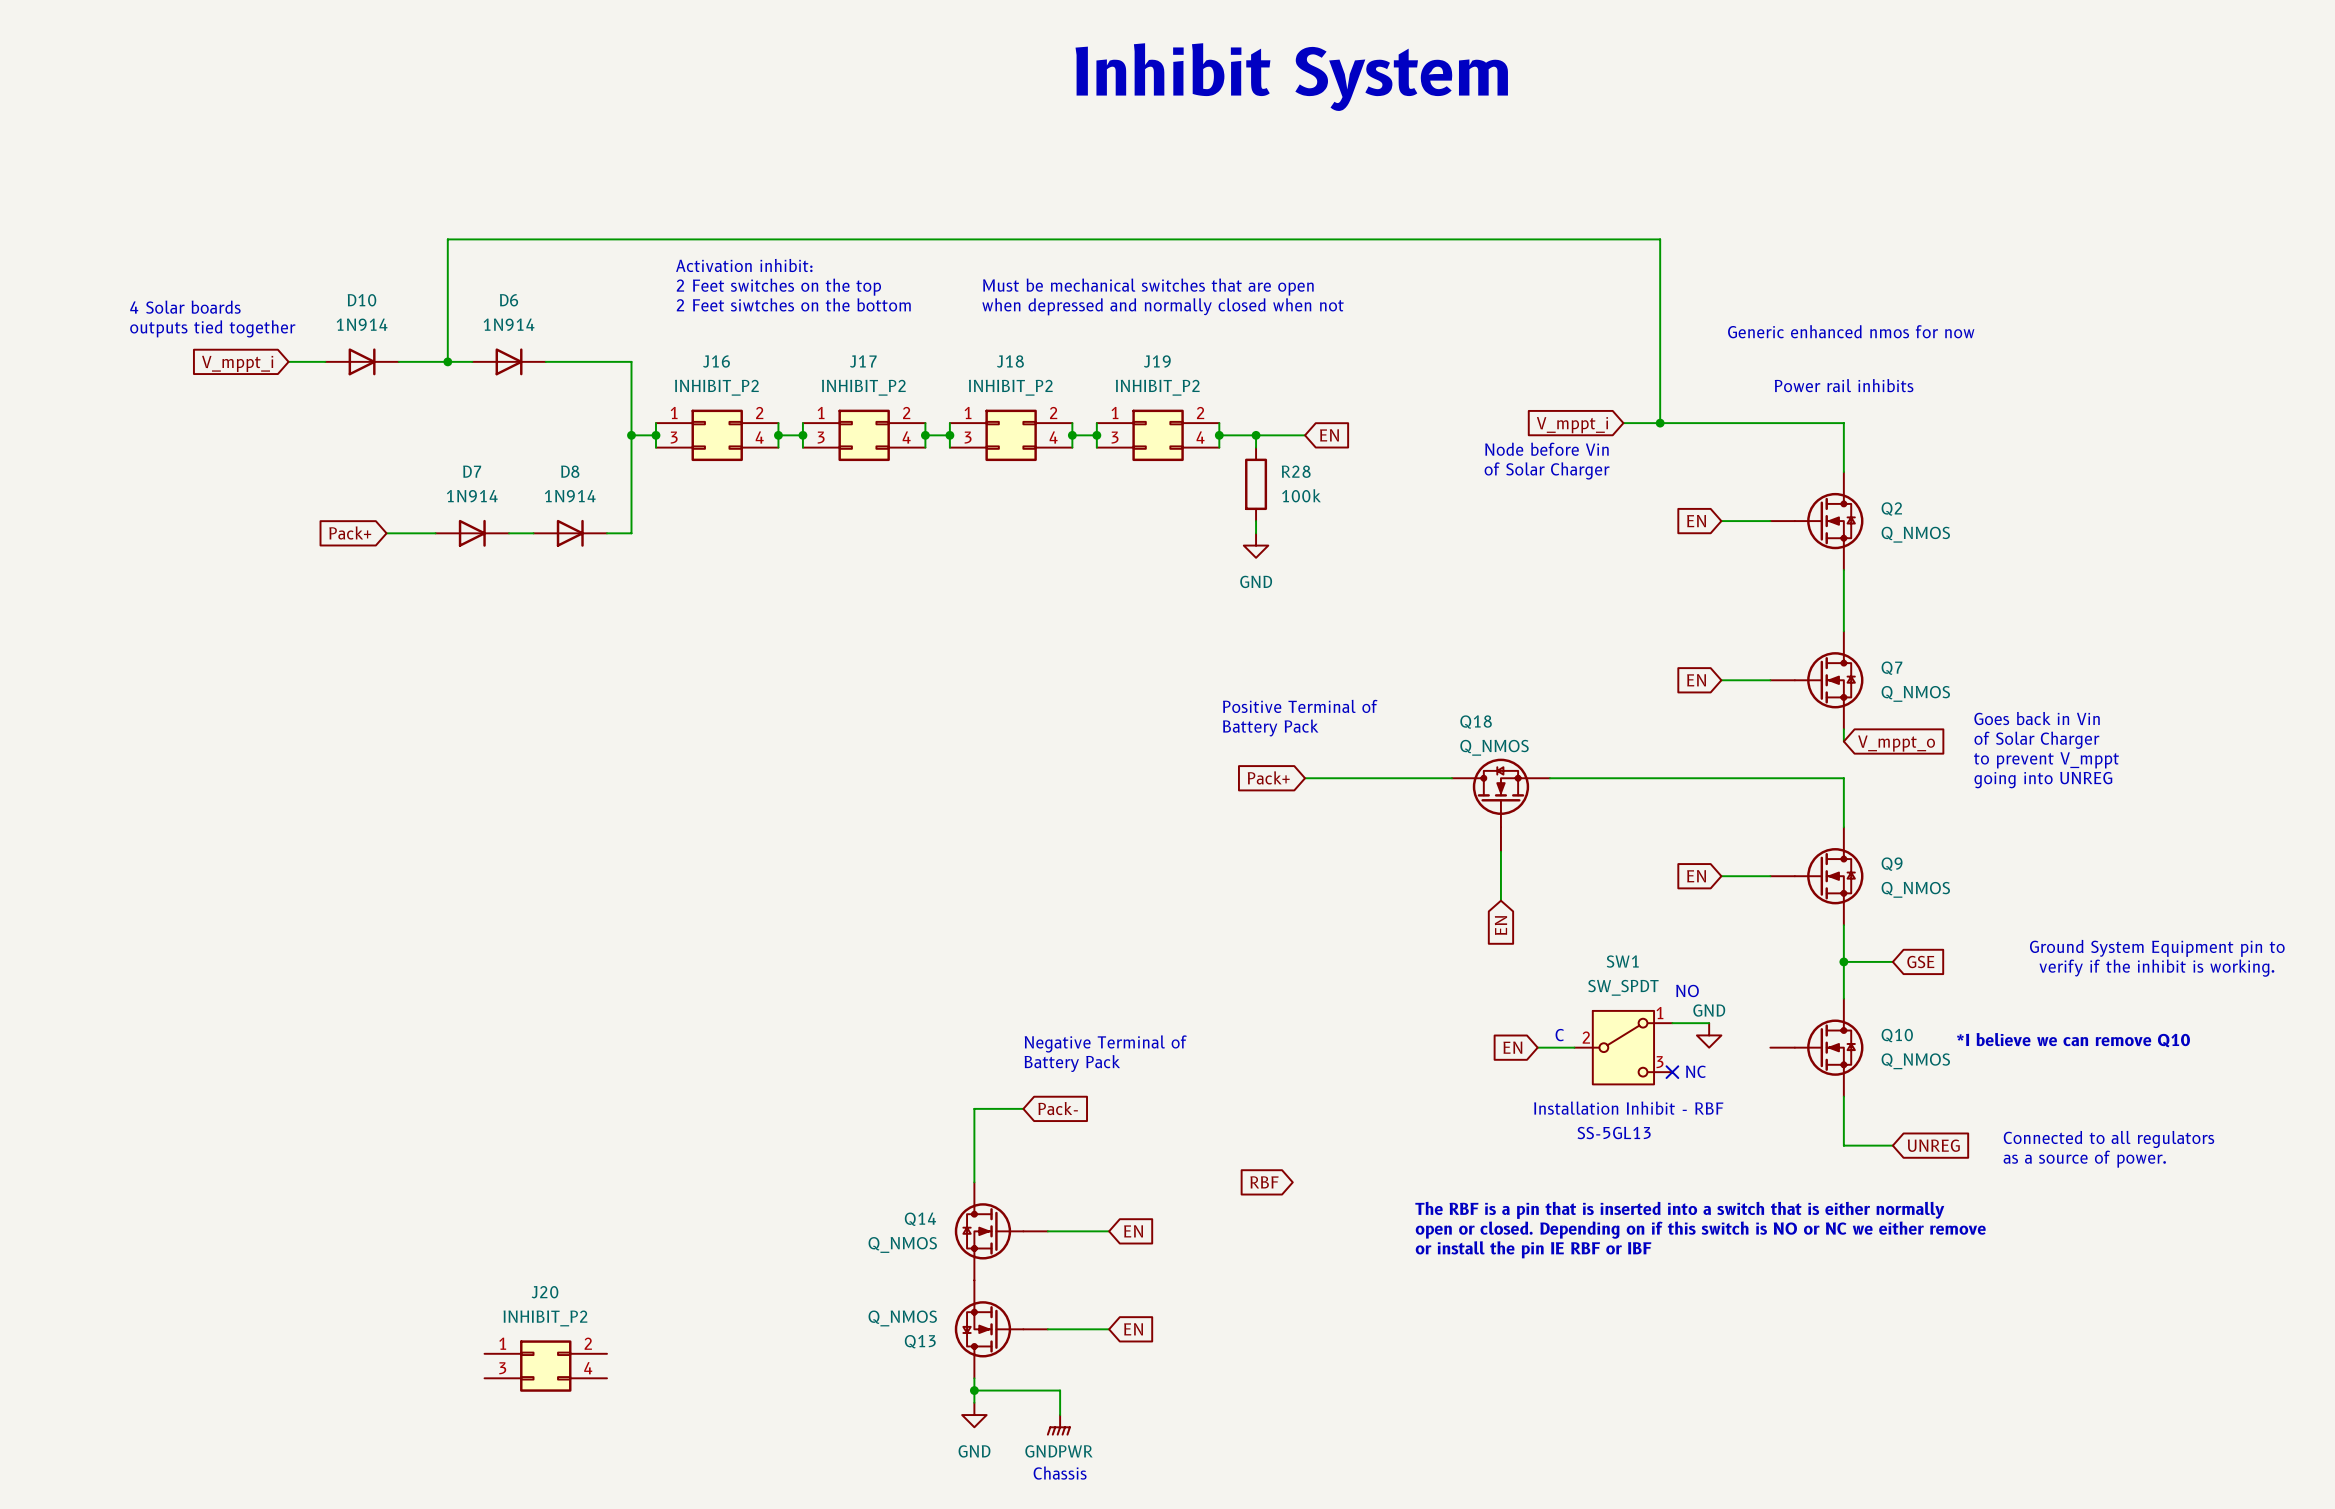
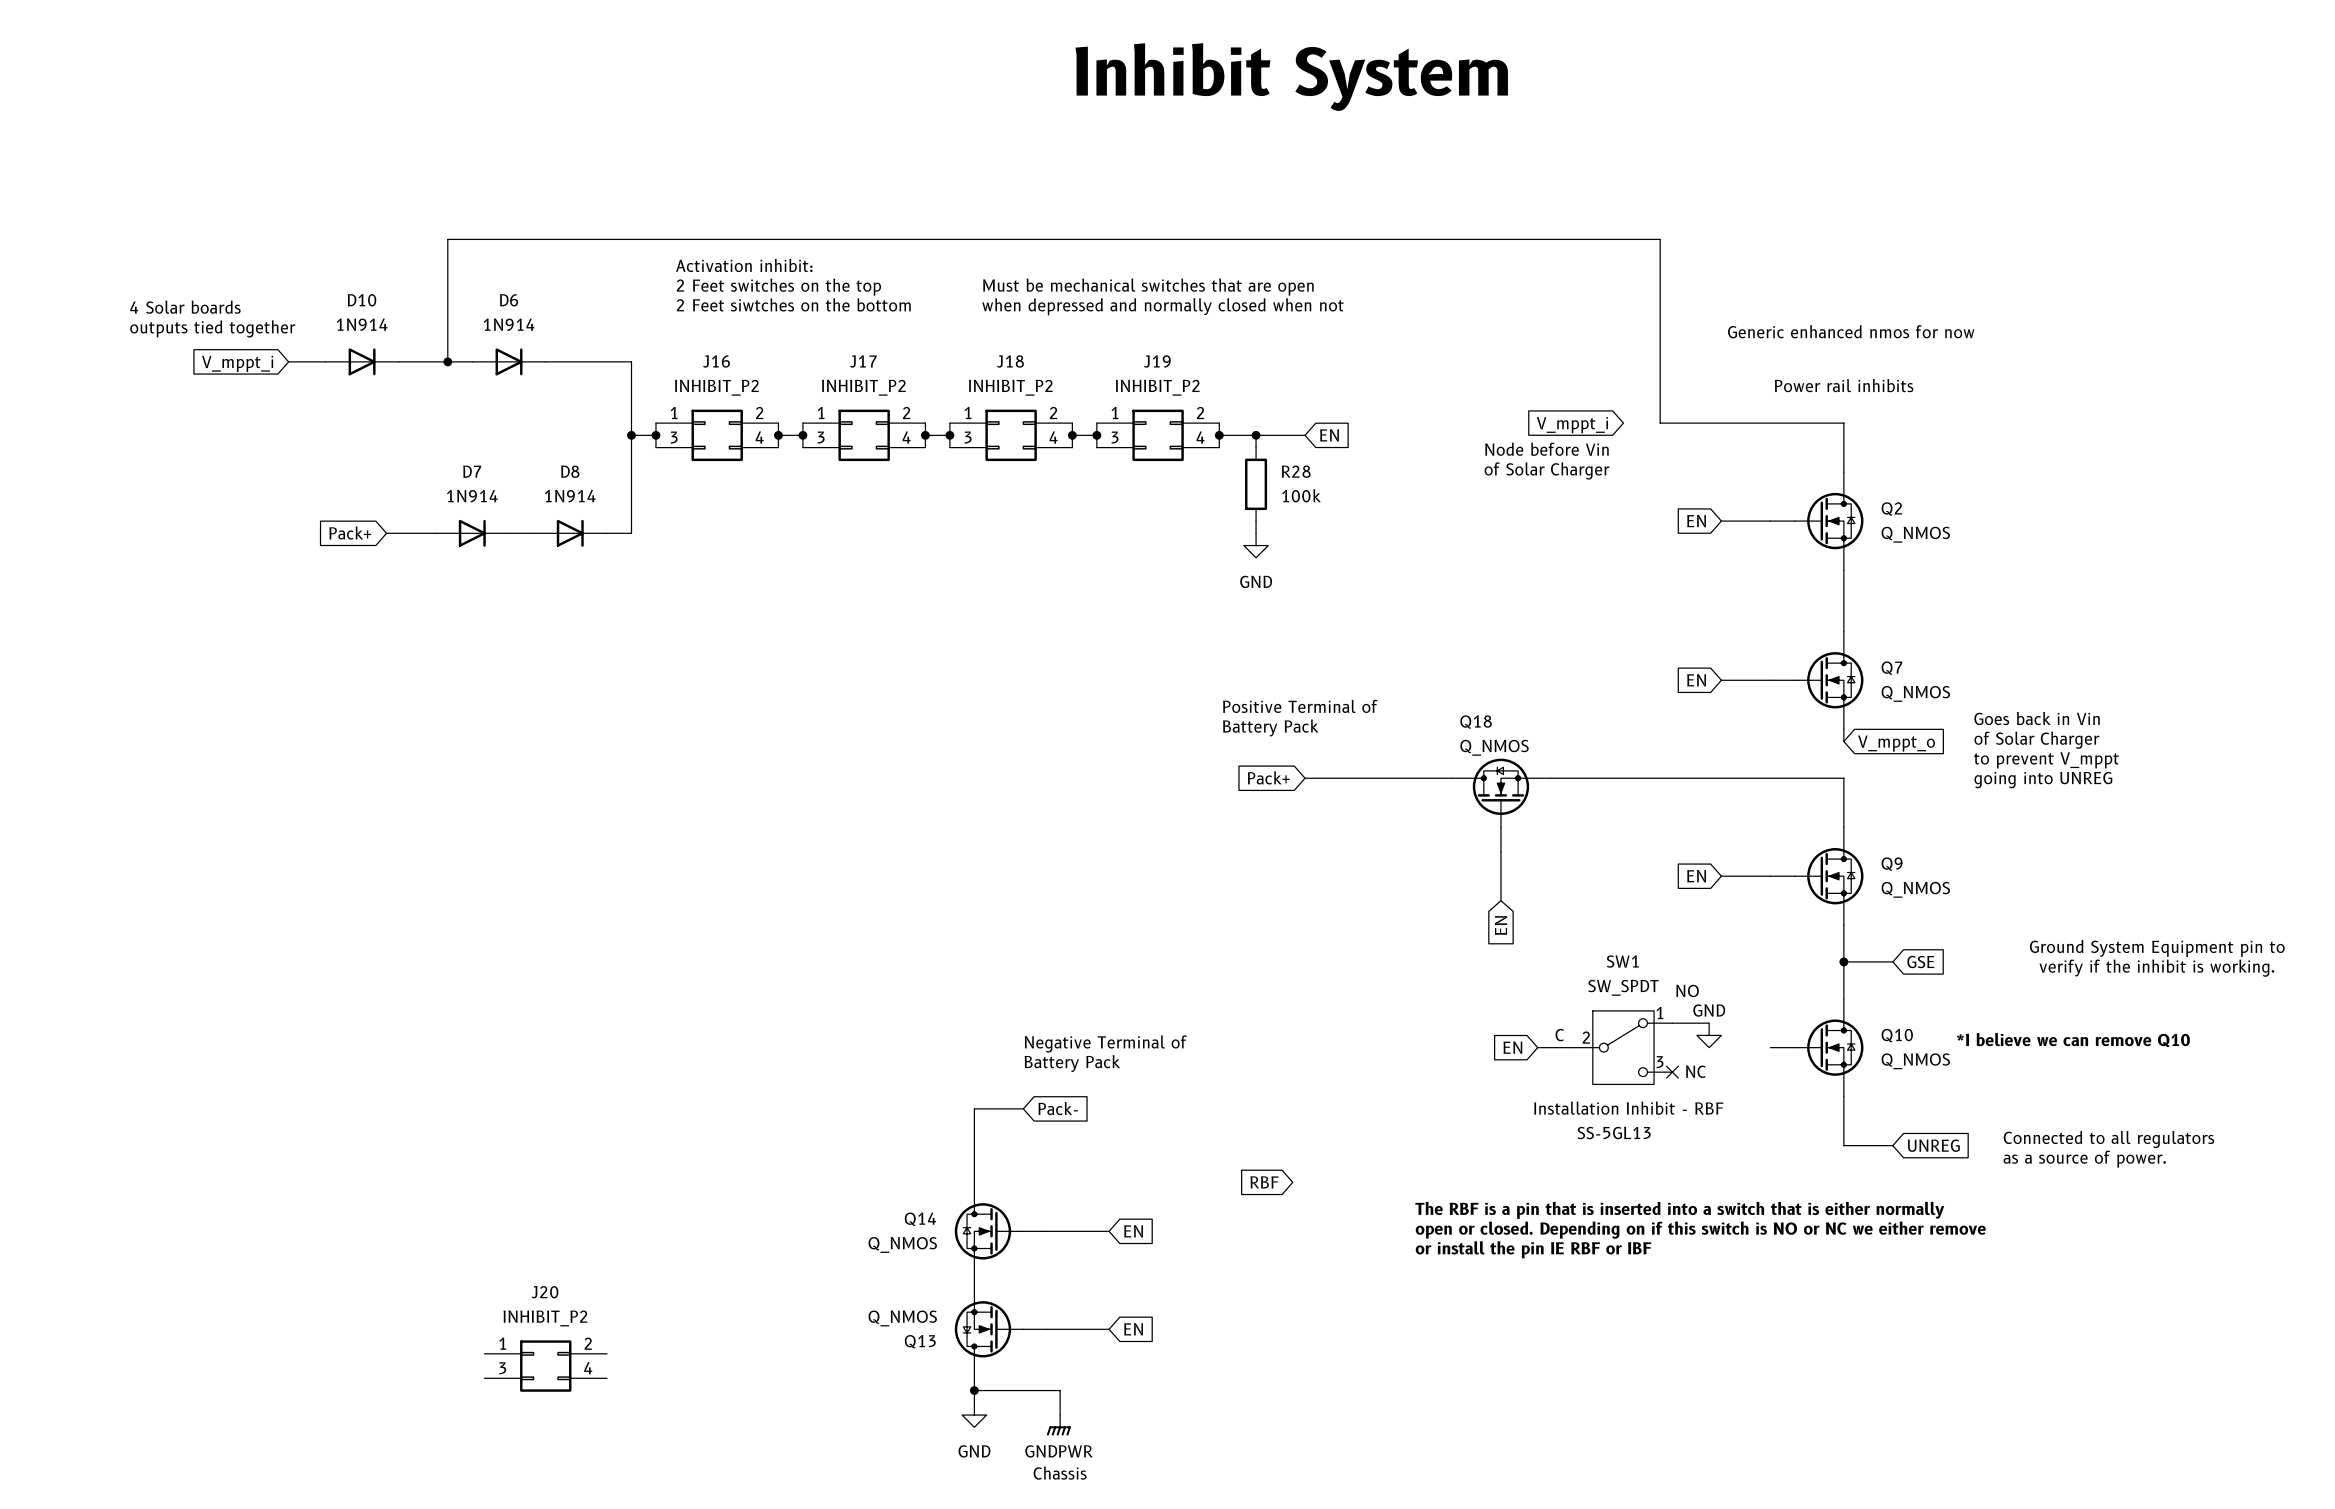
wire: (1623, 423) (1660, 423) -> none
junction: (1660, 423) -> none

